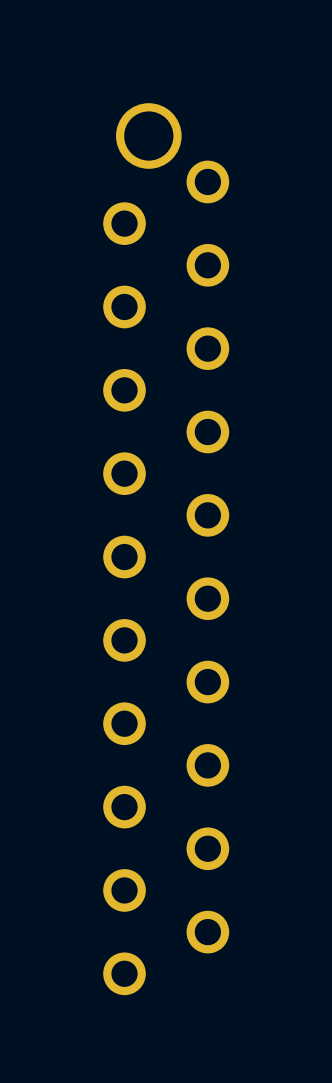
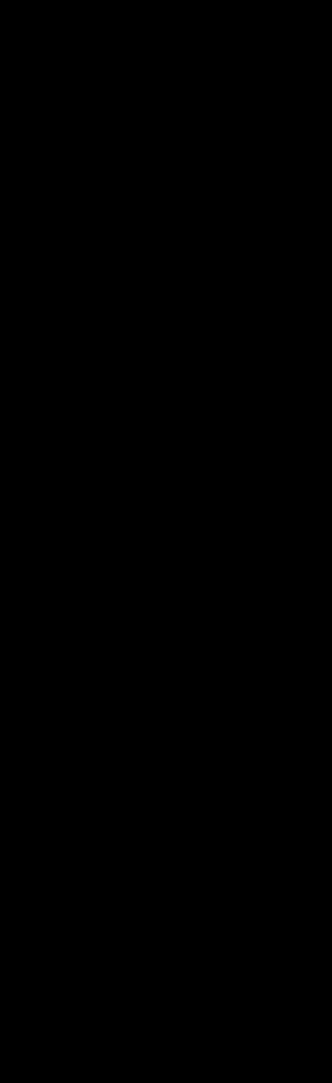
part: (166, 549) -> none

